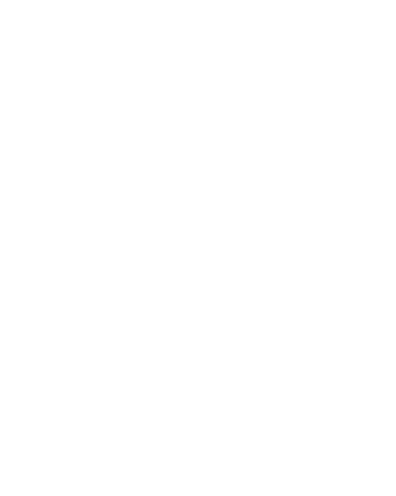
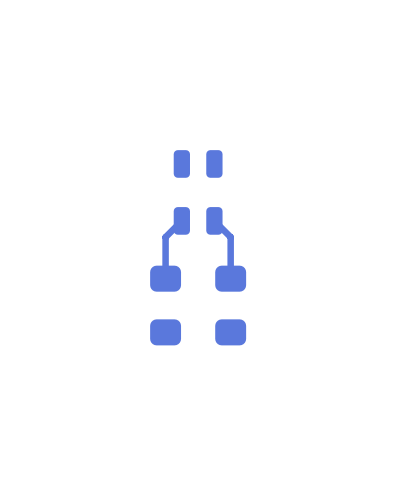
part: none -> (198, 192)
bottom track: none -> (181, 220) (165, 237) (165, 278)
bottom track: none -> (214, 220) (230, 237) (230, 278)
part: none -> (165, 305)
part: none -> (230, 305)

